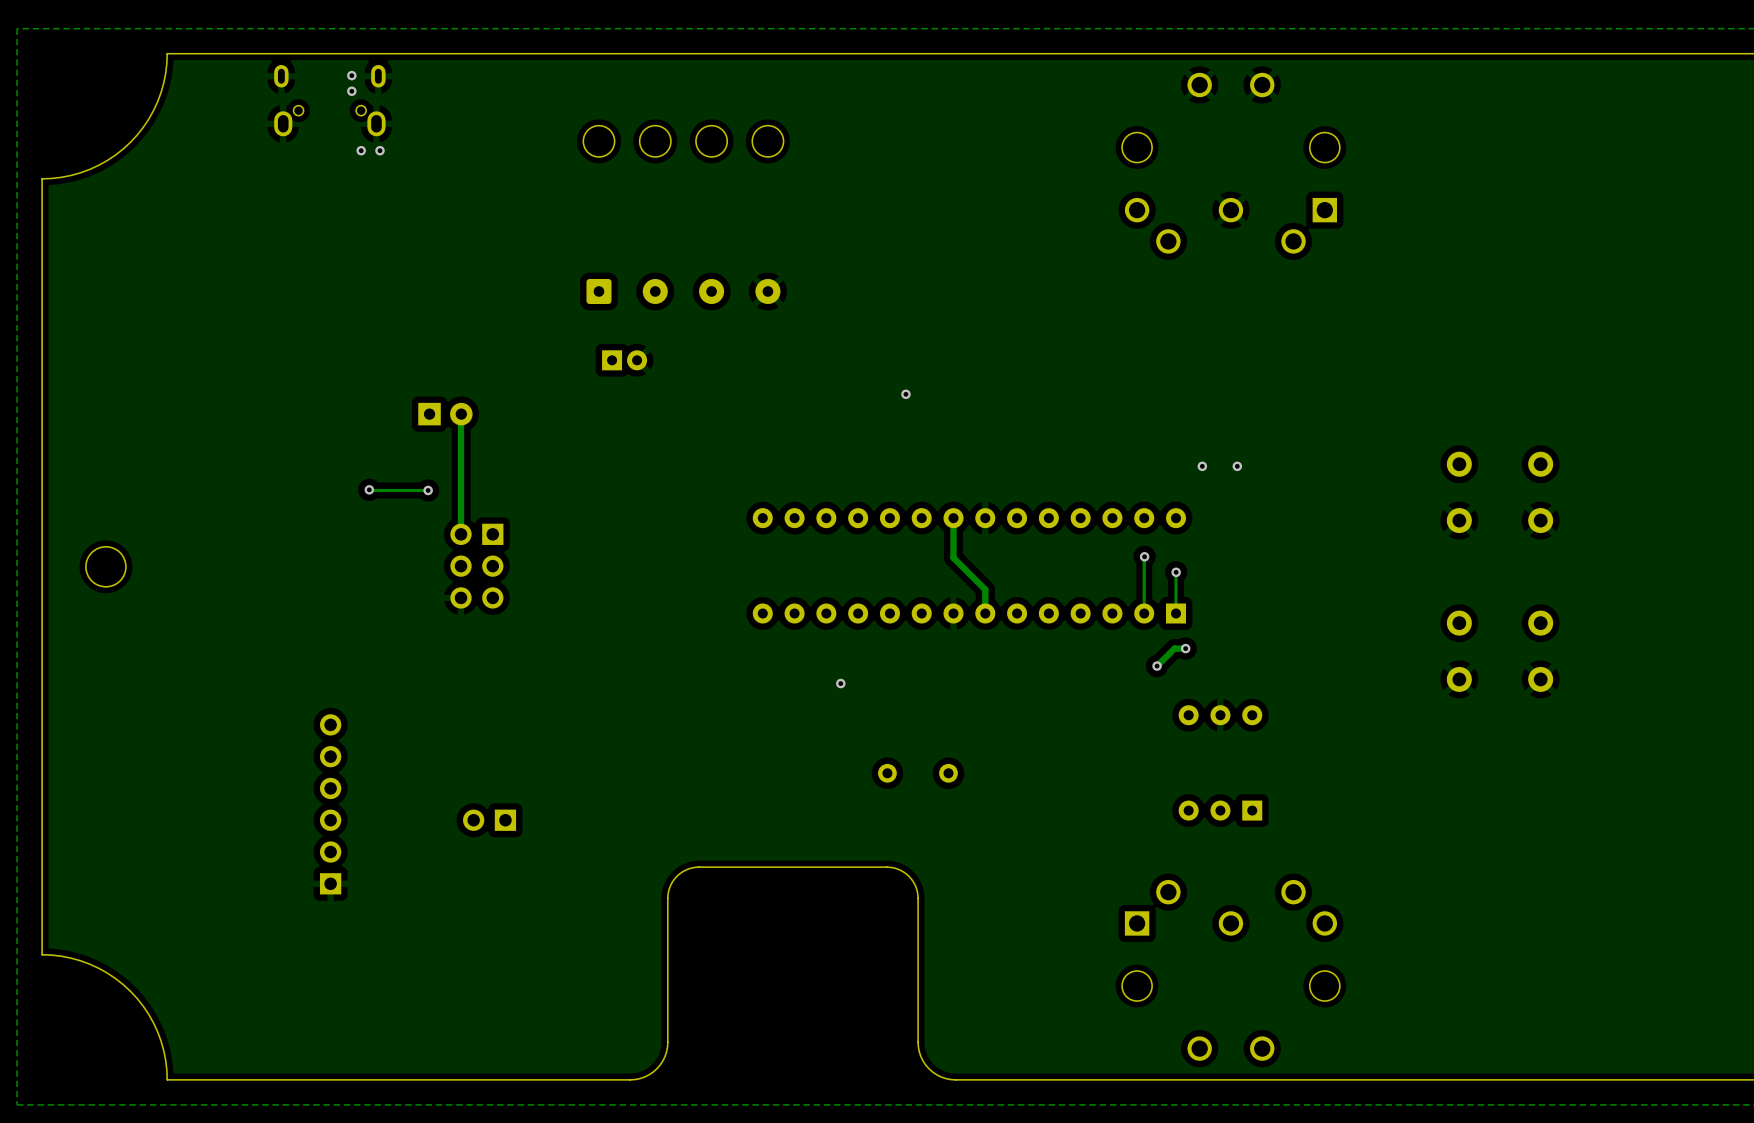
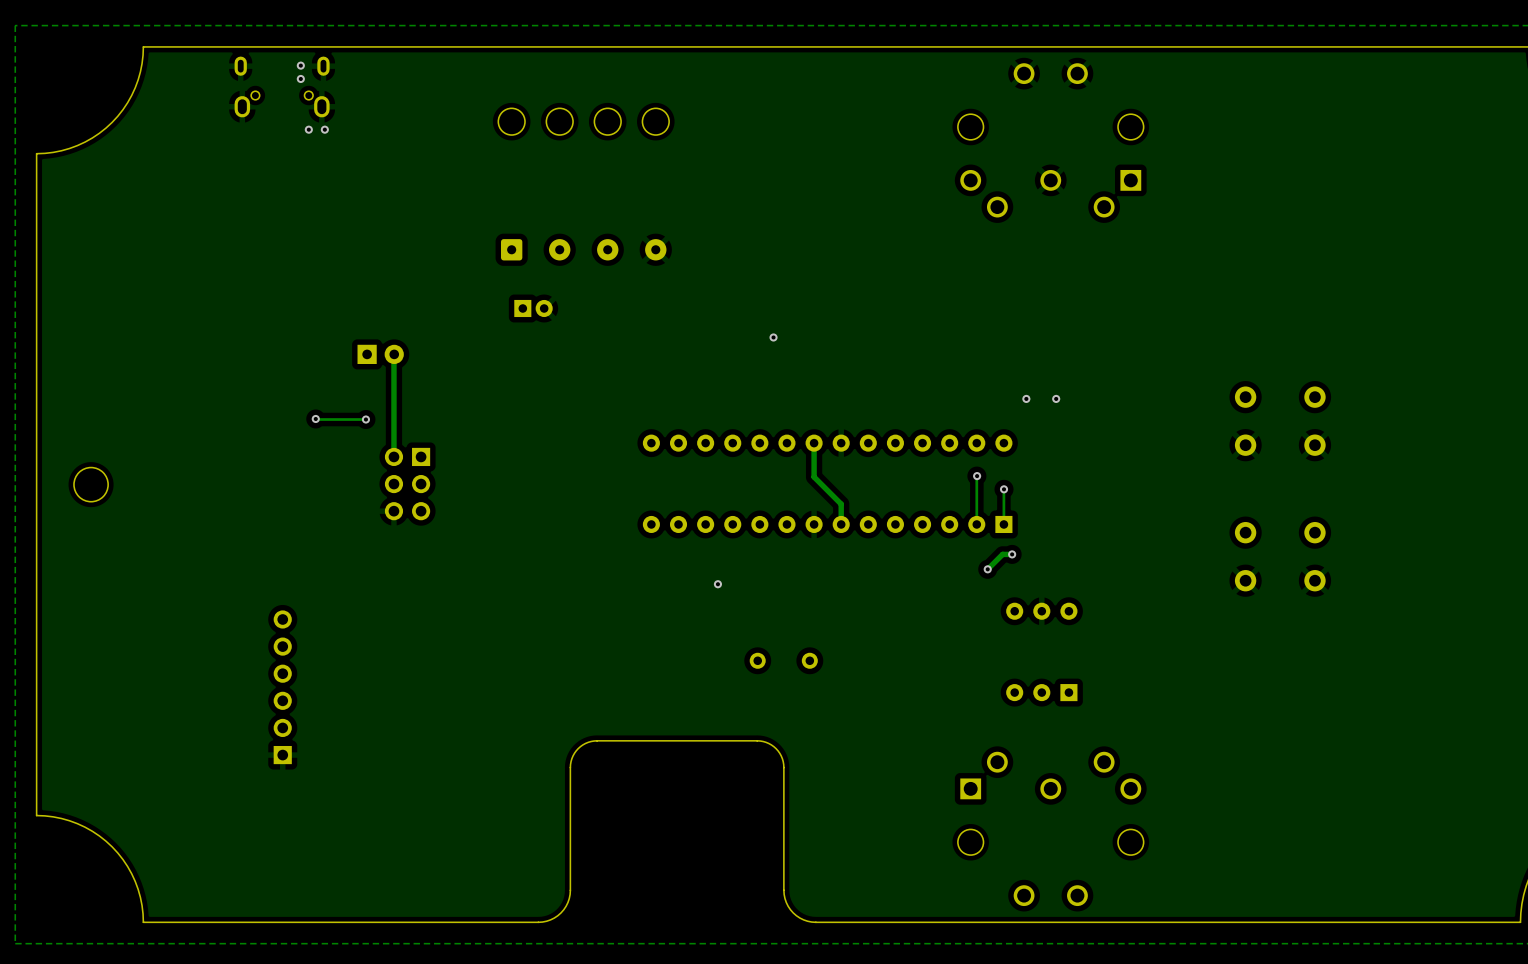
part: (489, 820) -> none

